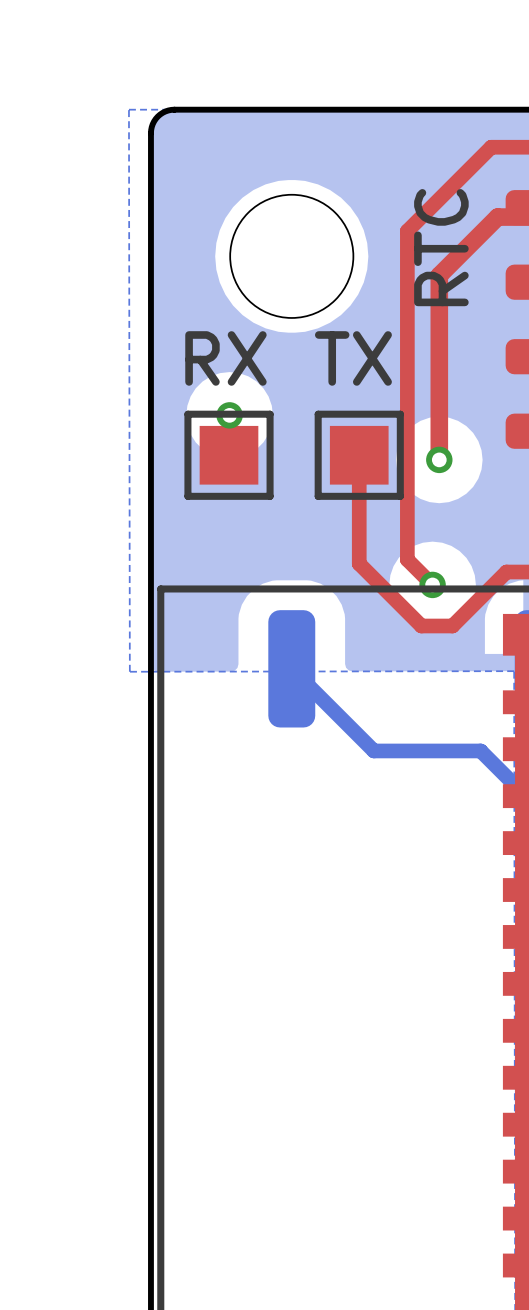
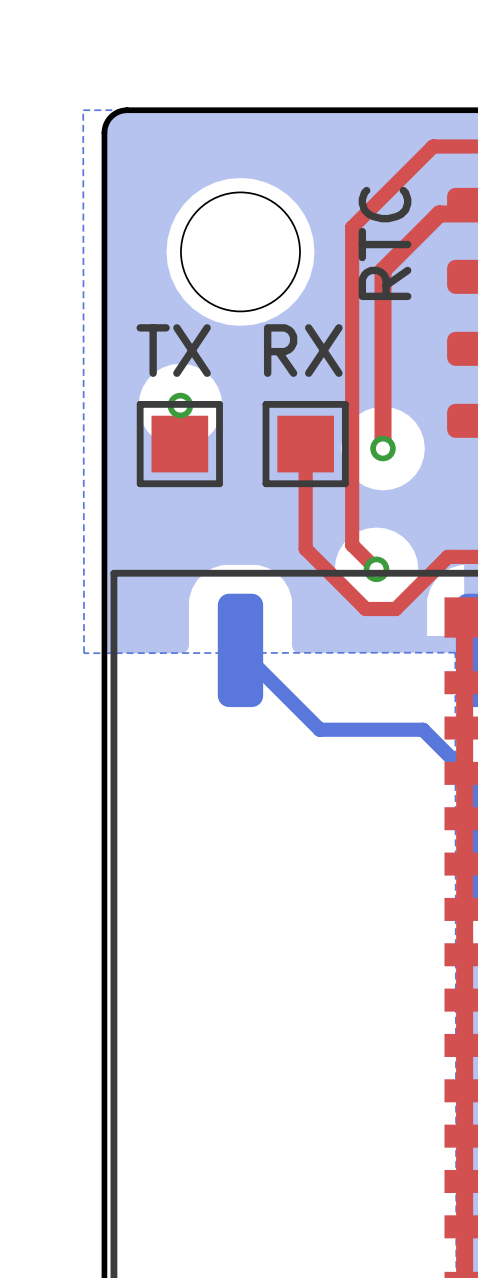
text: RX (225, 358) -> TX (173, 350)
text: TX (353, 358) -> RX (303, 350)

